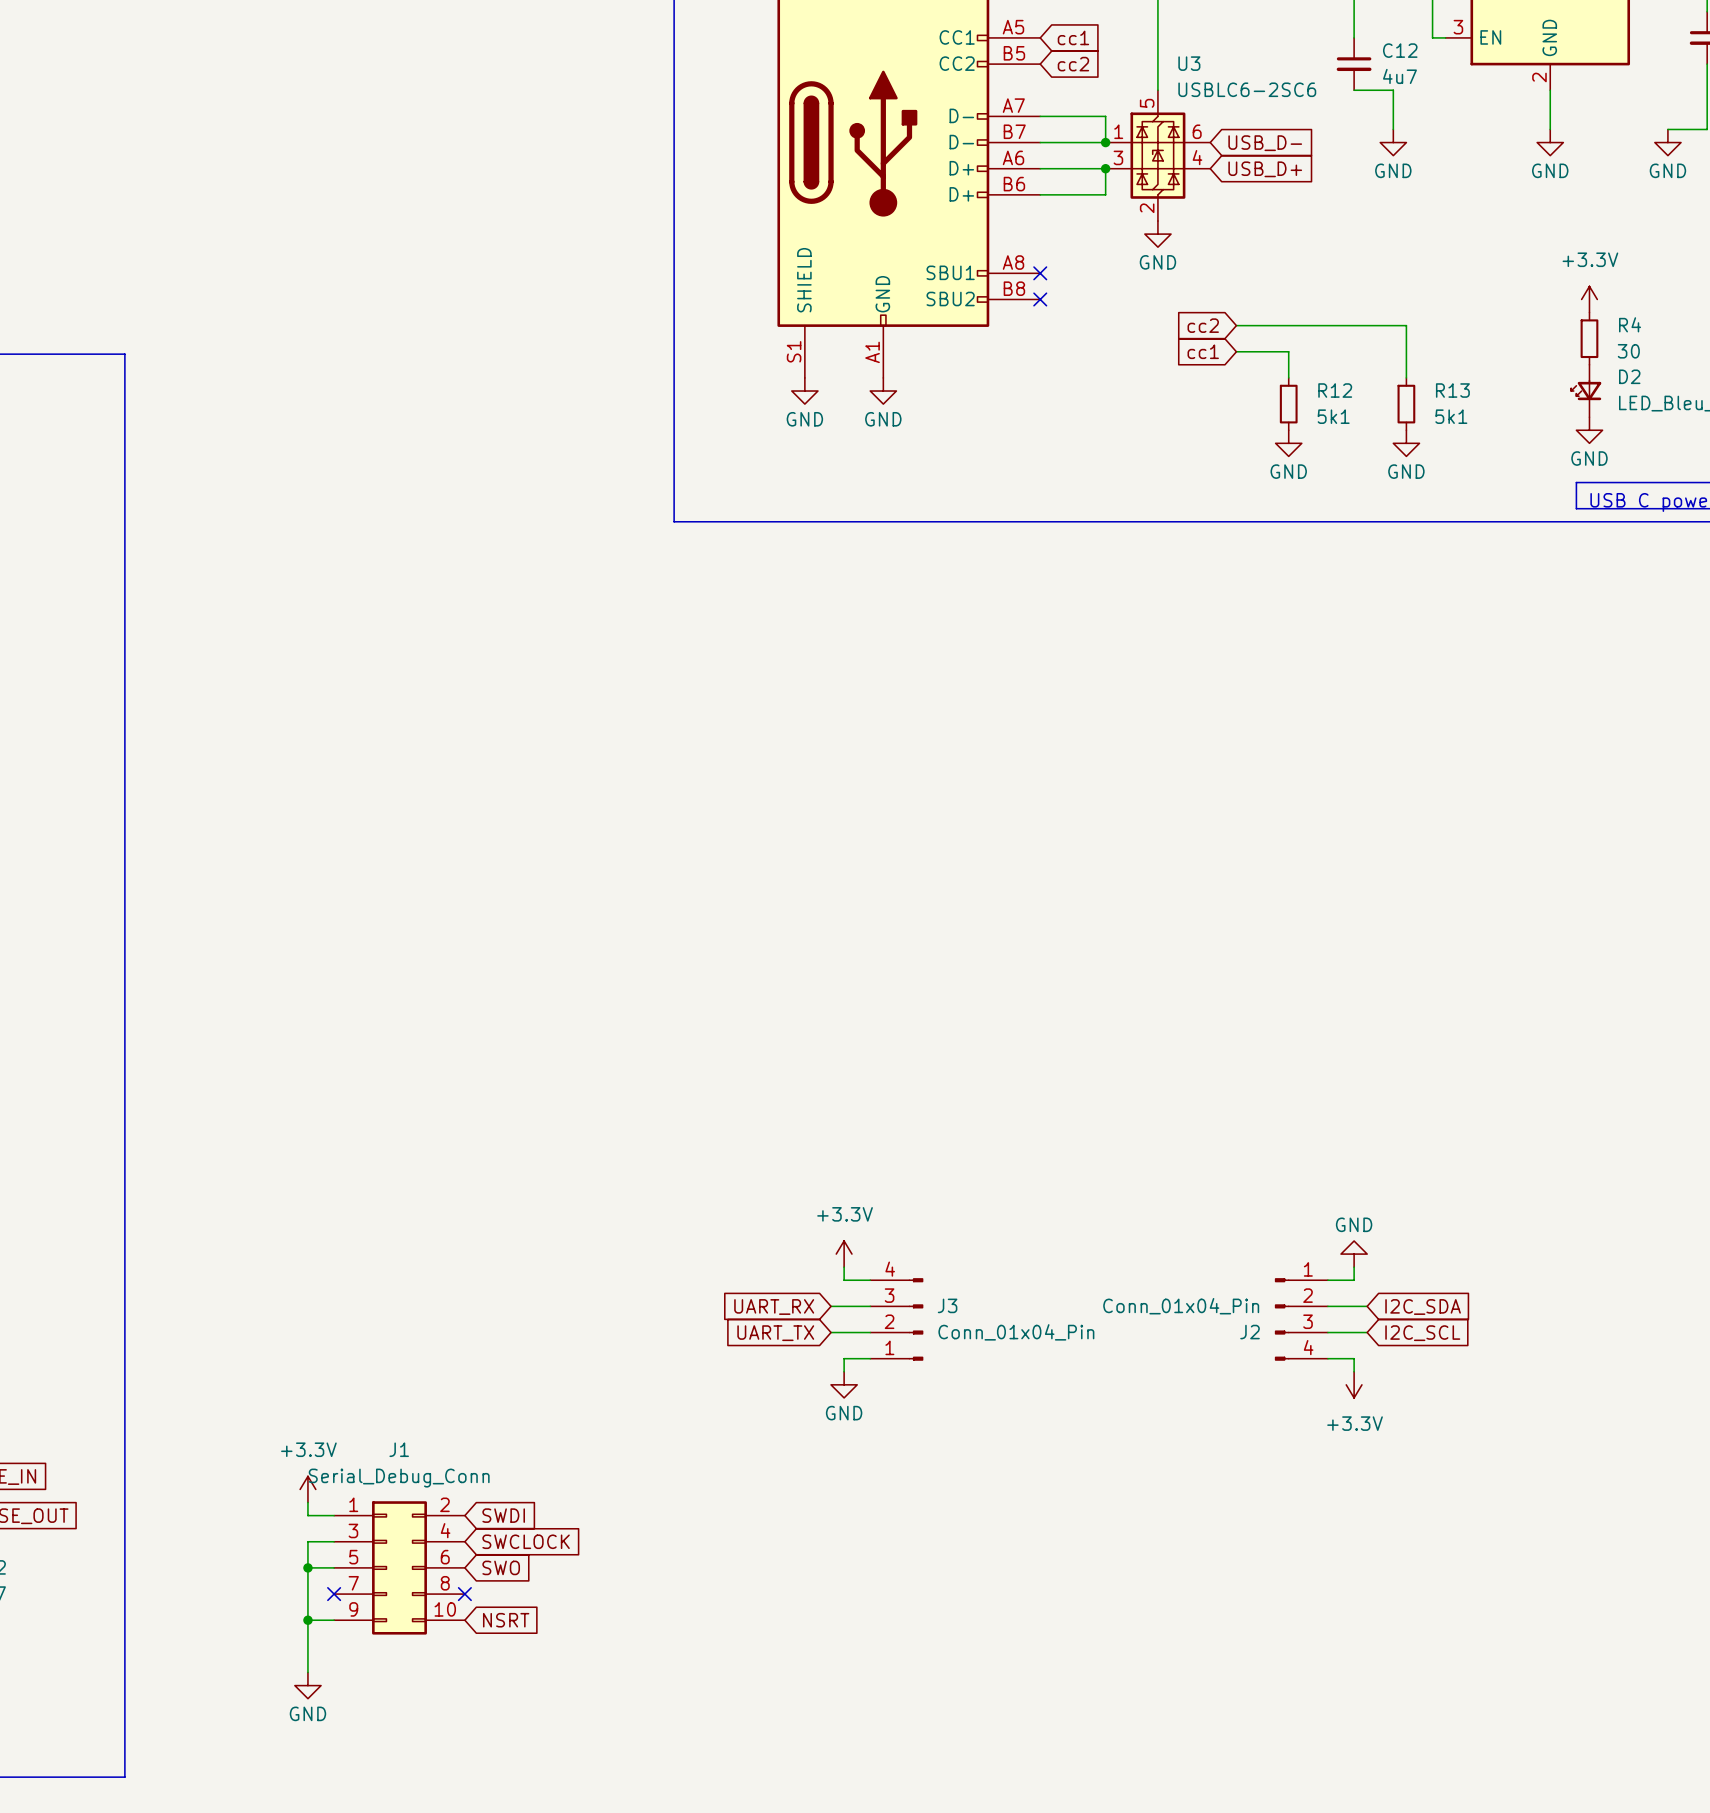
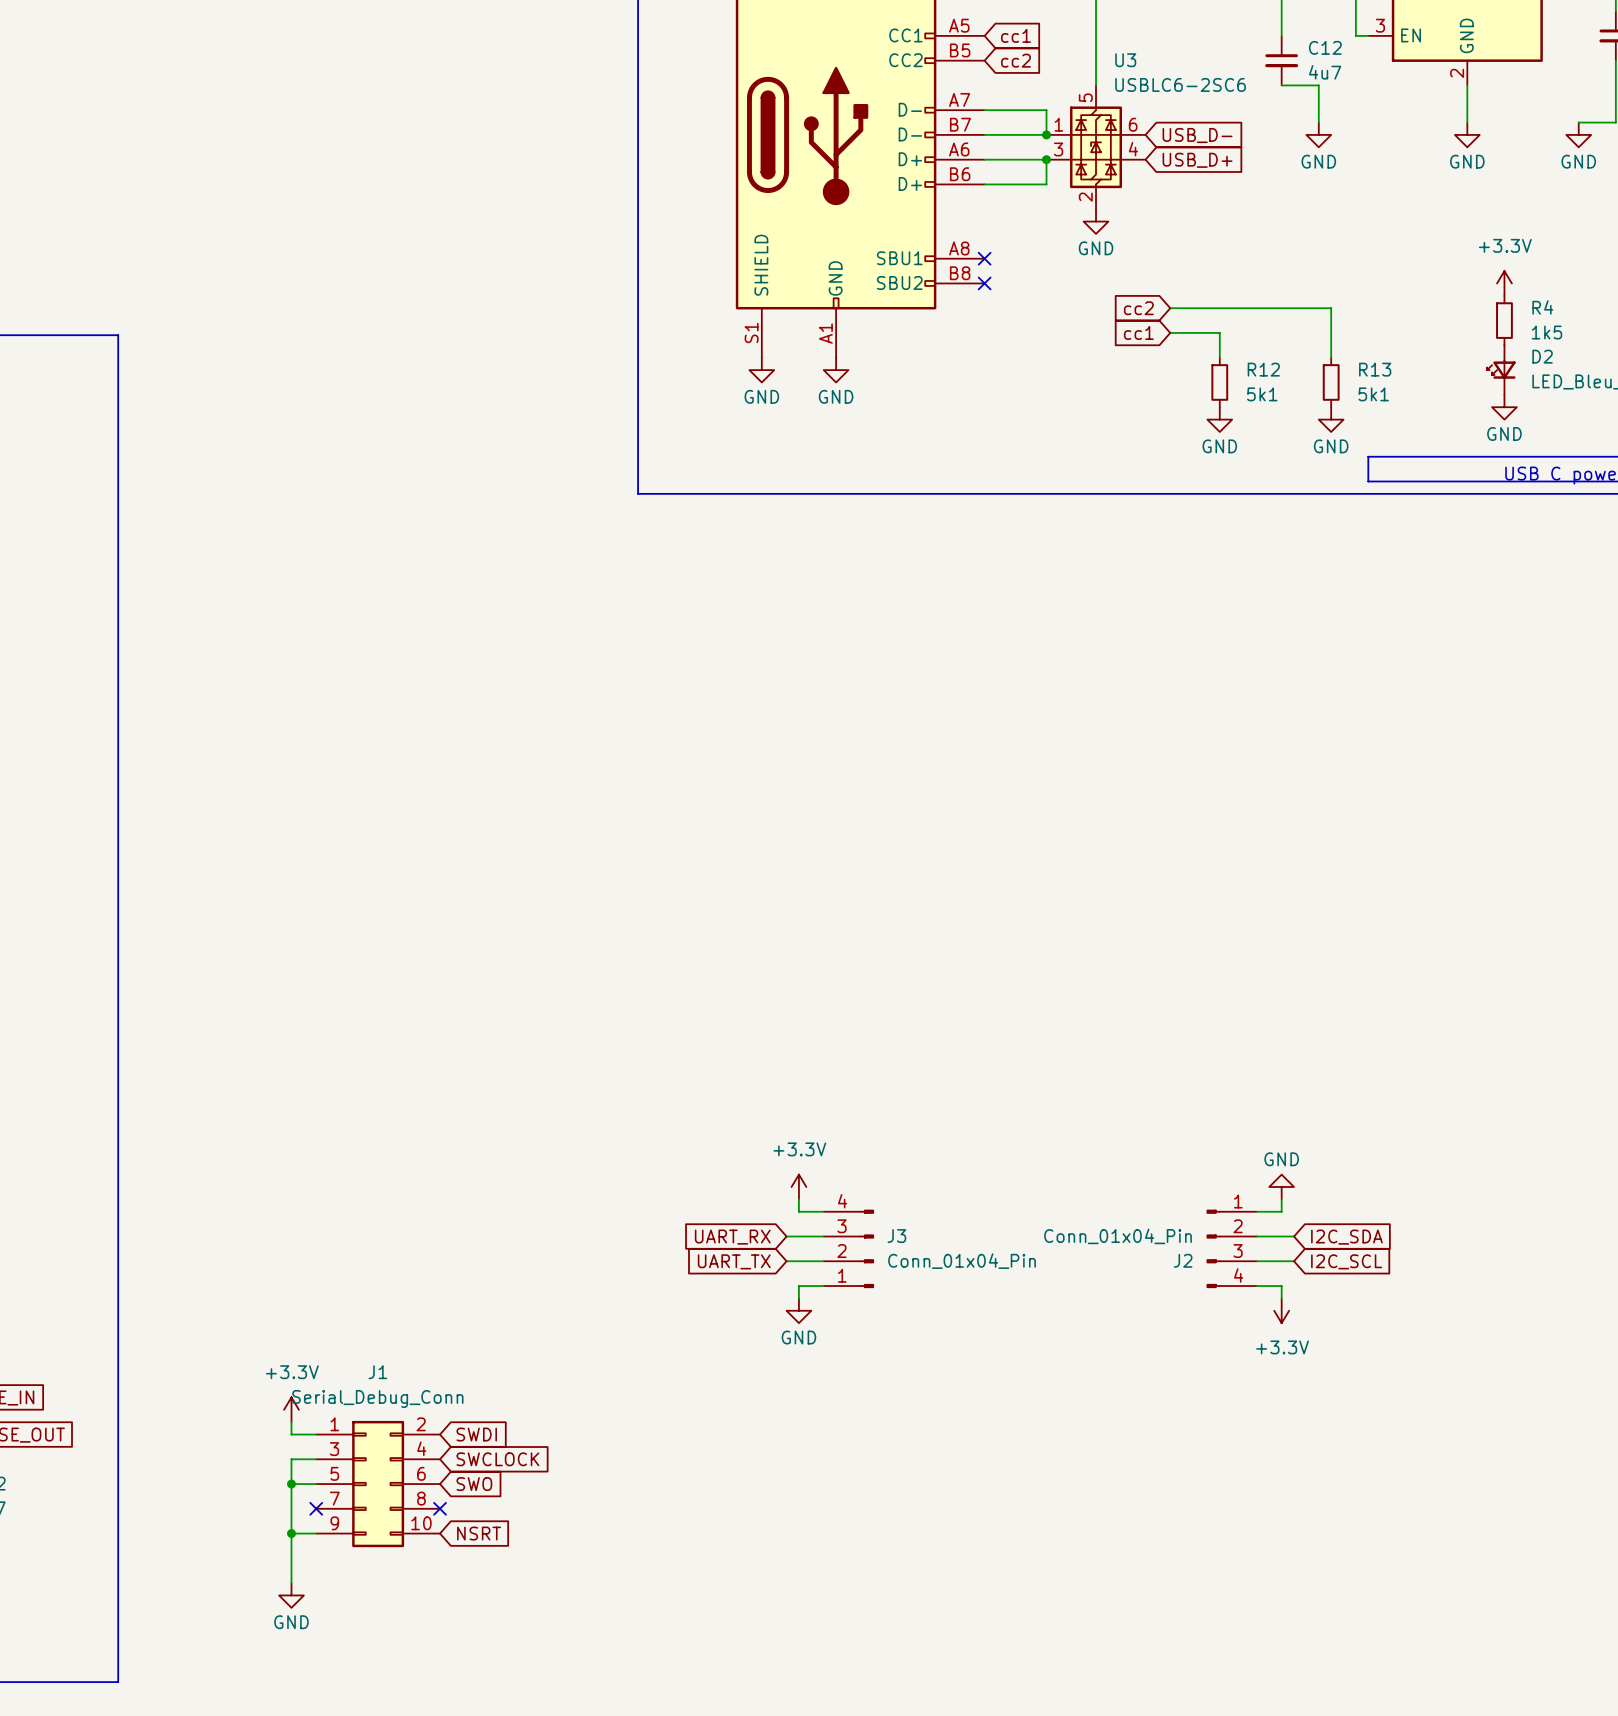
R4 value: 30 (1628, 351) -> 1k5 (1546, 332)
line: (1576, 482) (1576, 508) -> (1492, 456) (1368, 456) (1368, 481) (1492, 481)

